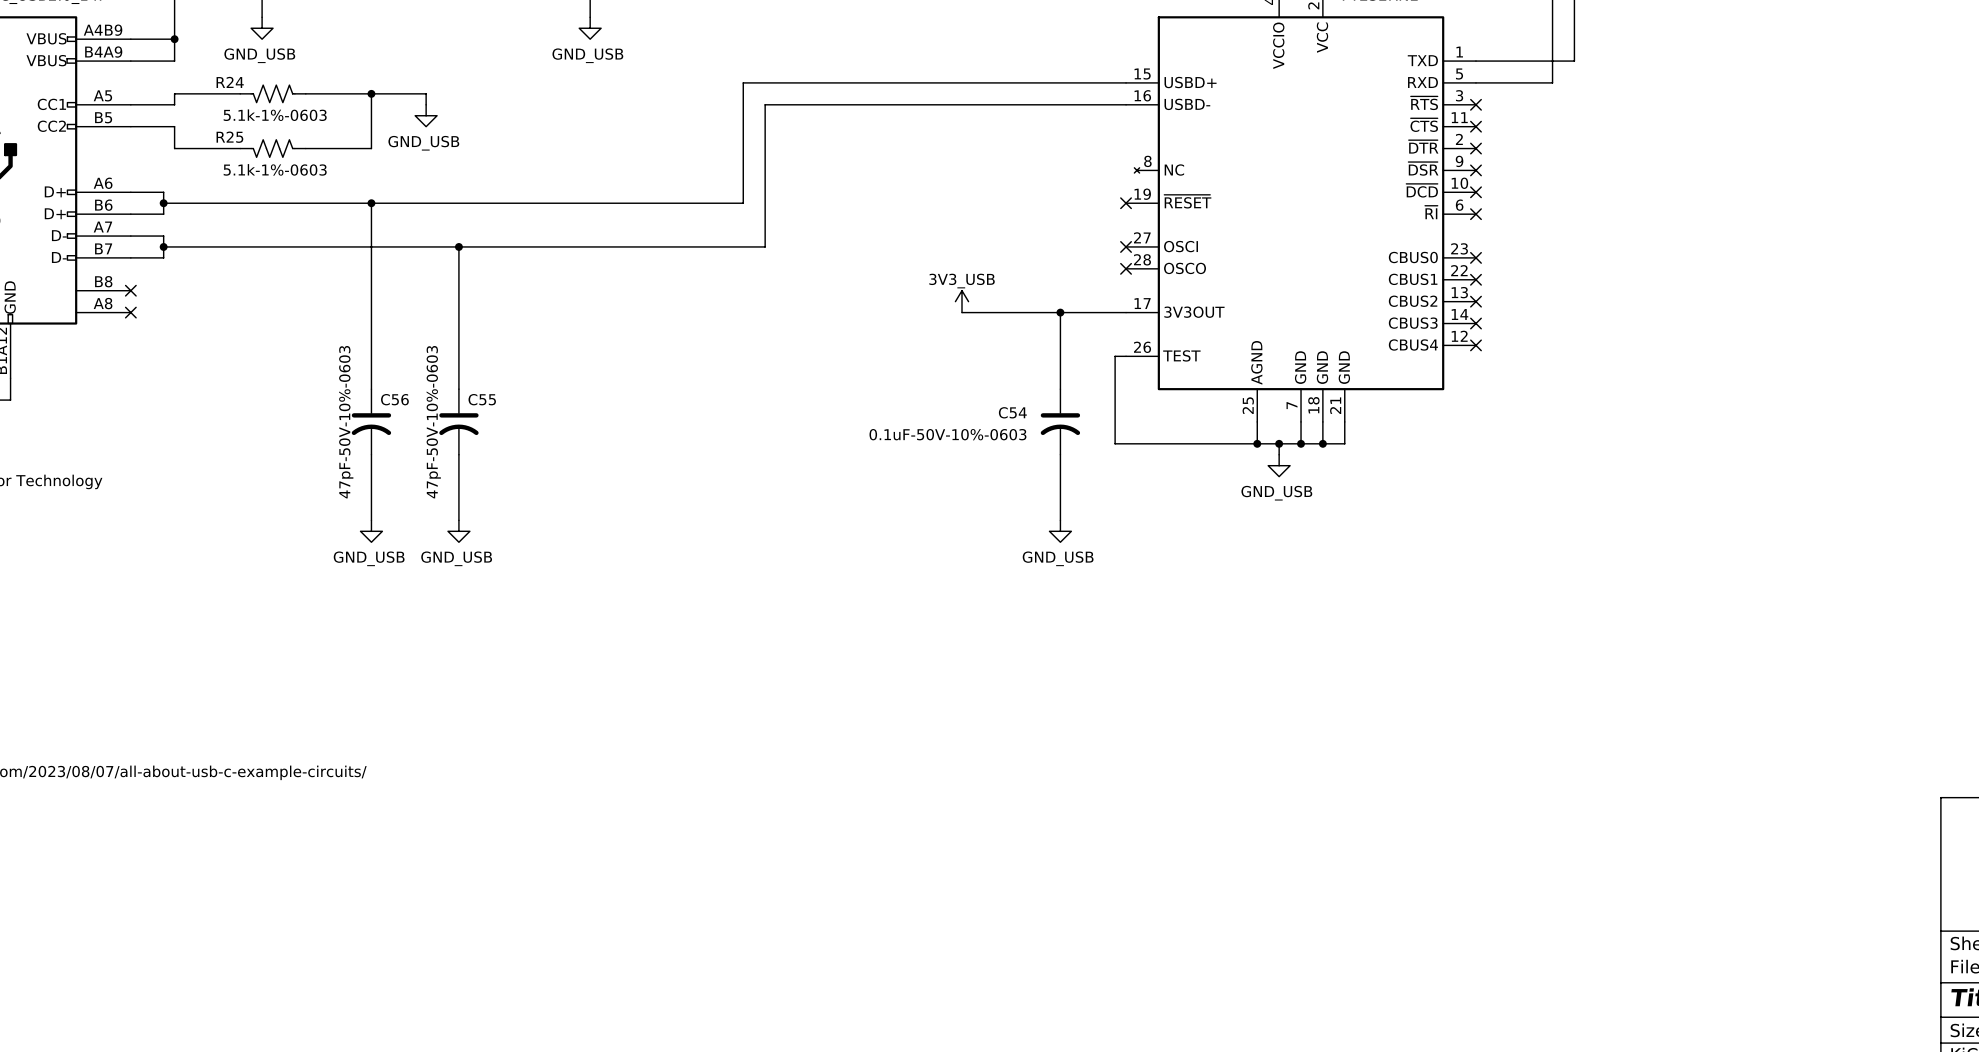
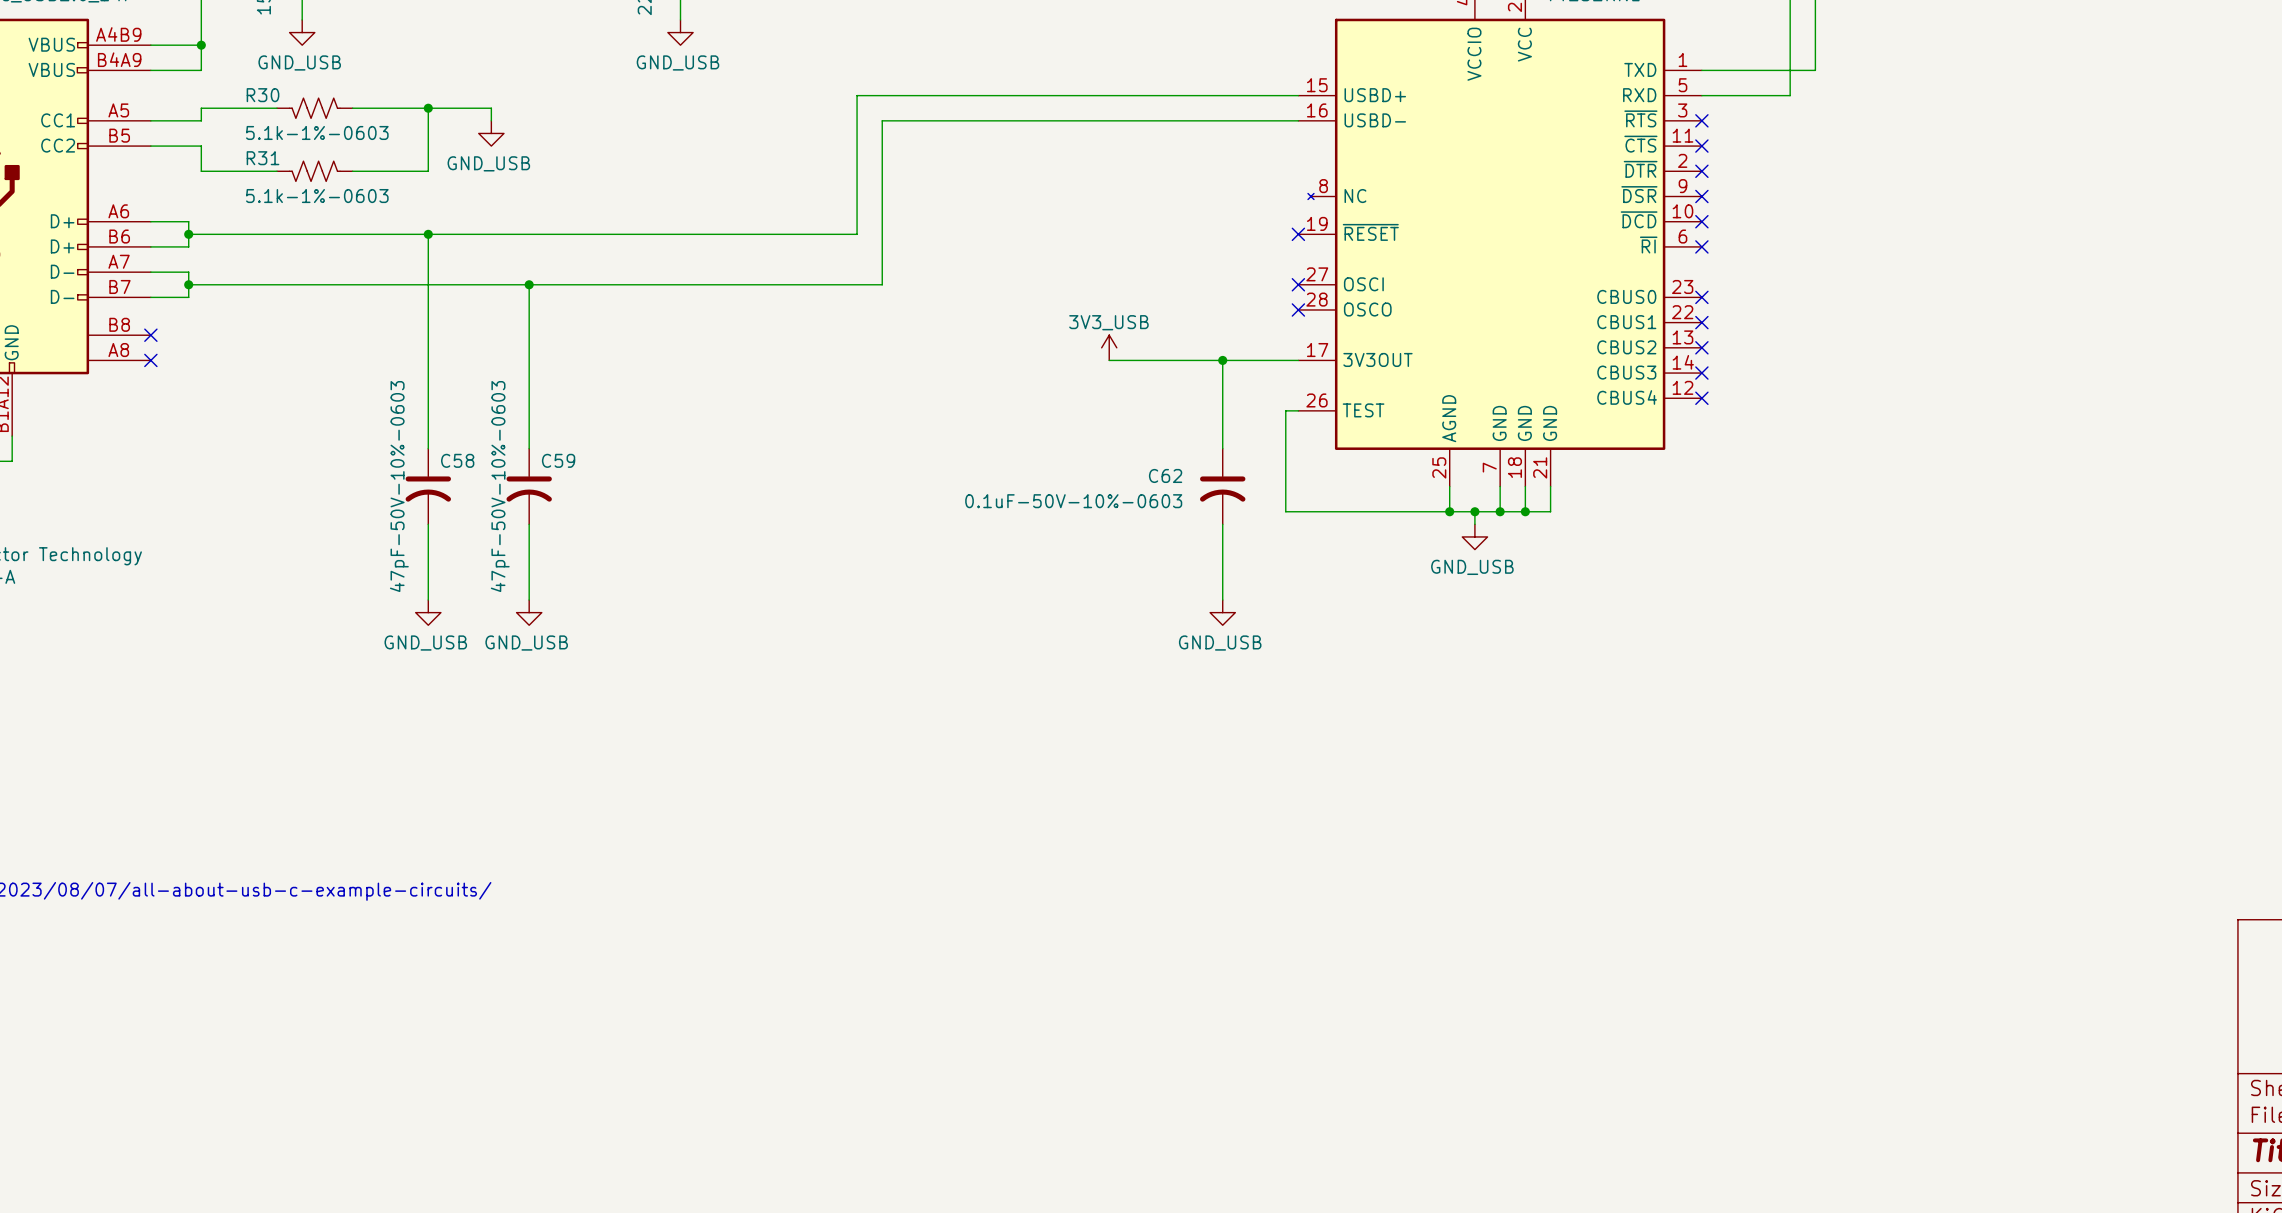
R24 name: R24 (230, 82) -> R30 (263, 95)
R25 name: R25 (229, 137) -> R31 (263, 158)
C56 name: C56 (394, 399) -> C58 (457, 460)
C55 name: C55 (482, 399) -> C59 (558, 460)
C54 name: C54 (1012, 412) -> C62 (1165, 475)

